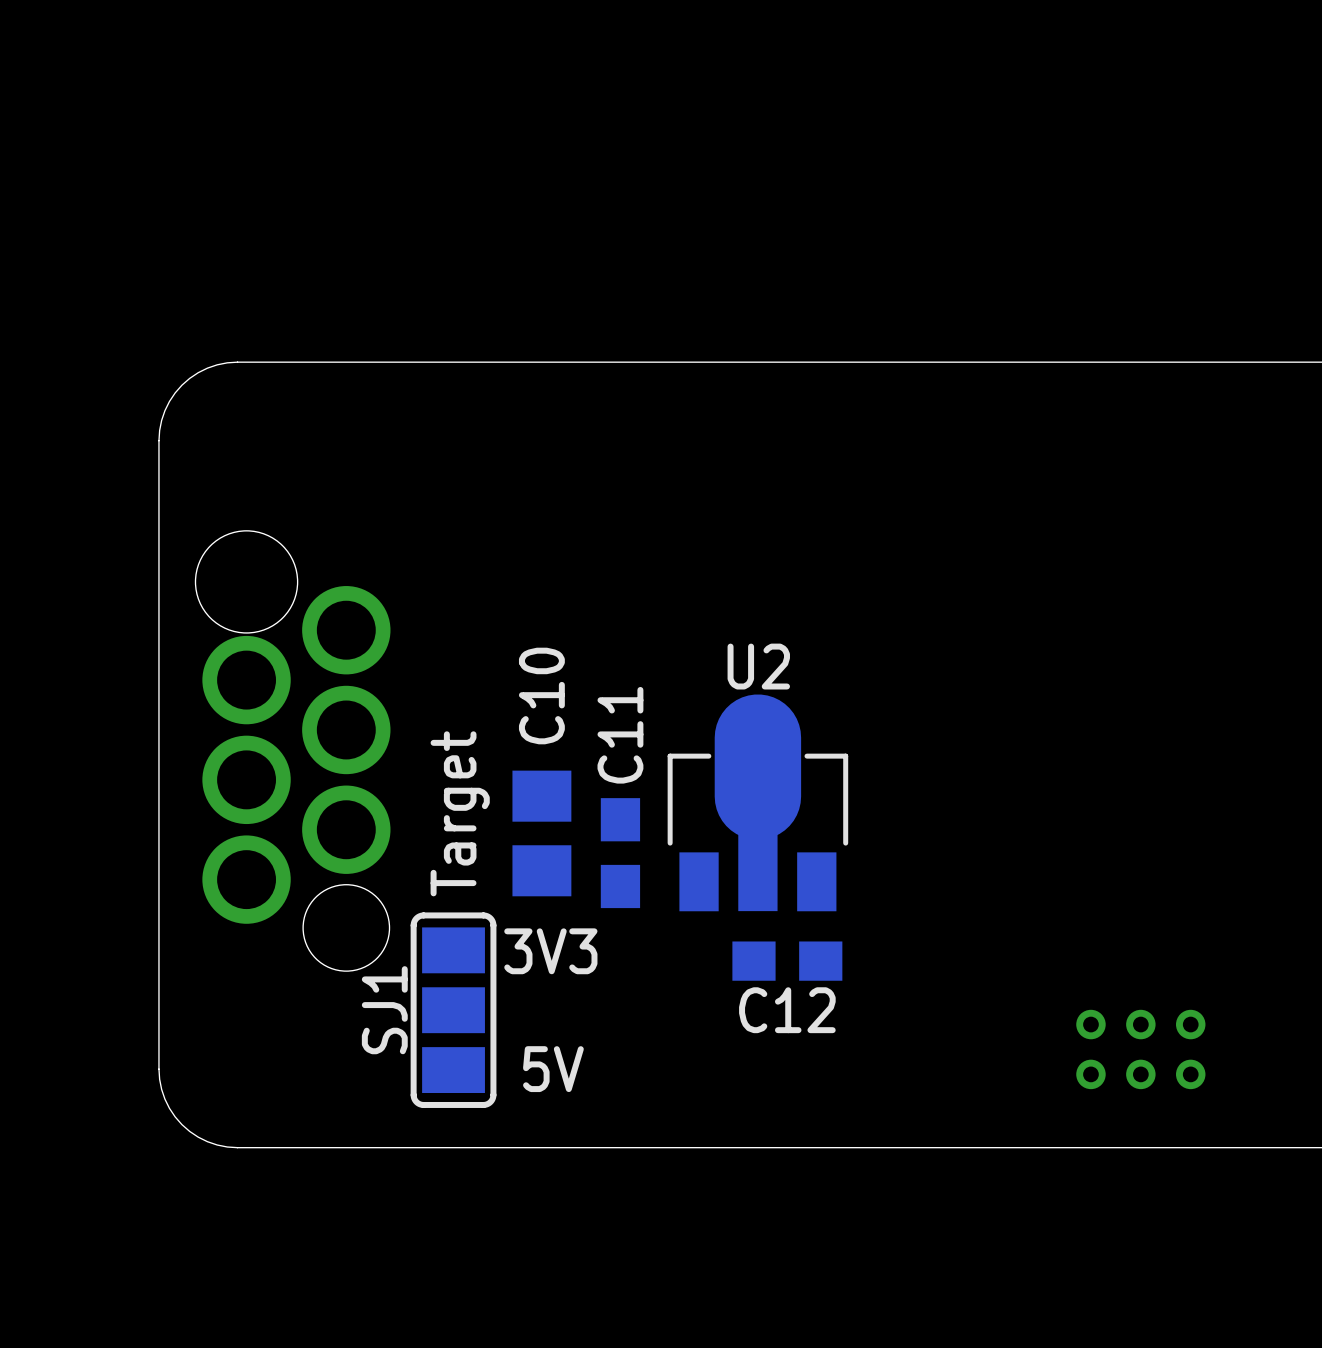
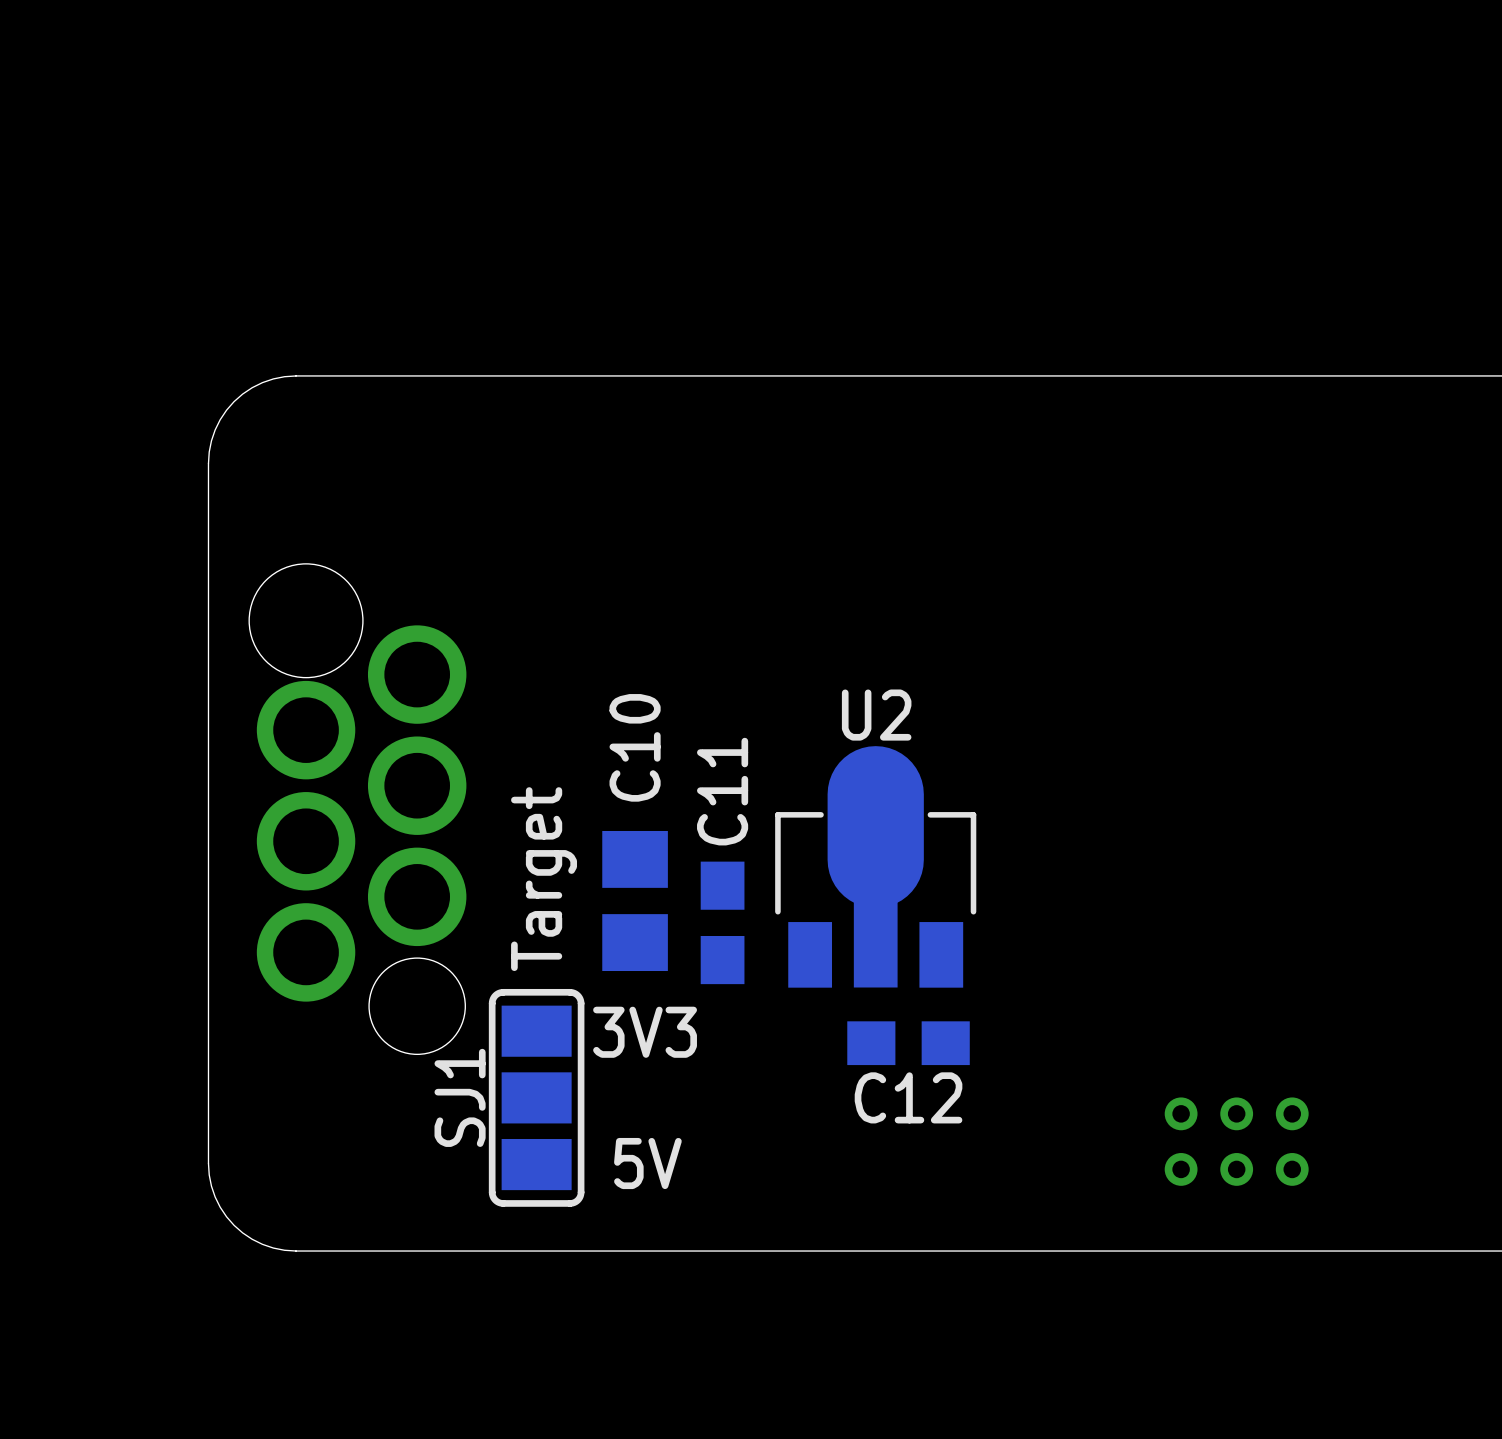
part position: (1140, 1049) -> (1236, 1141)

